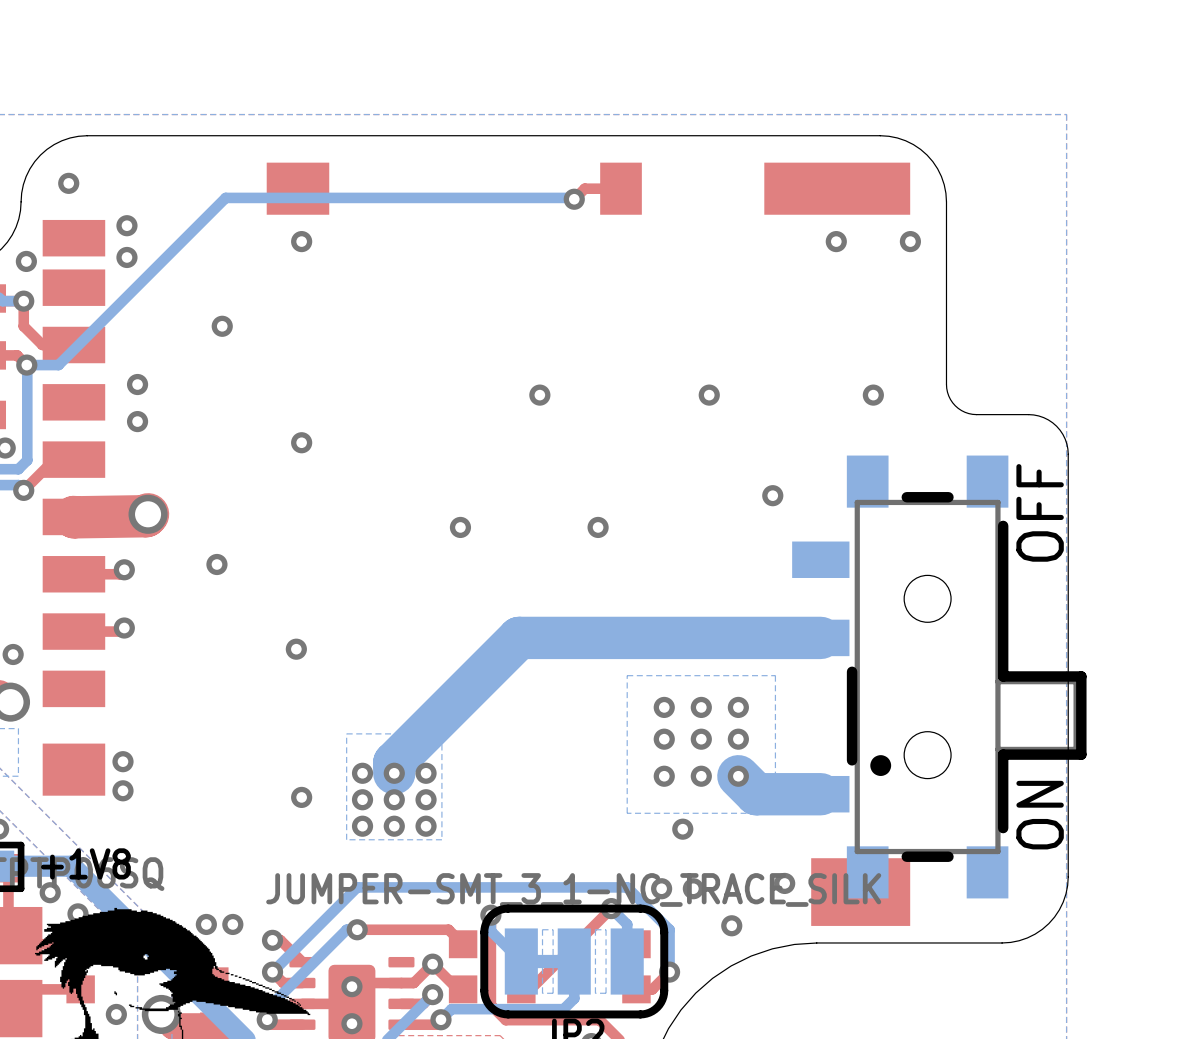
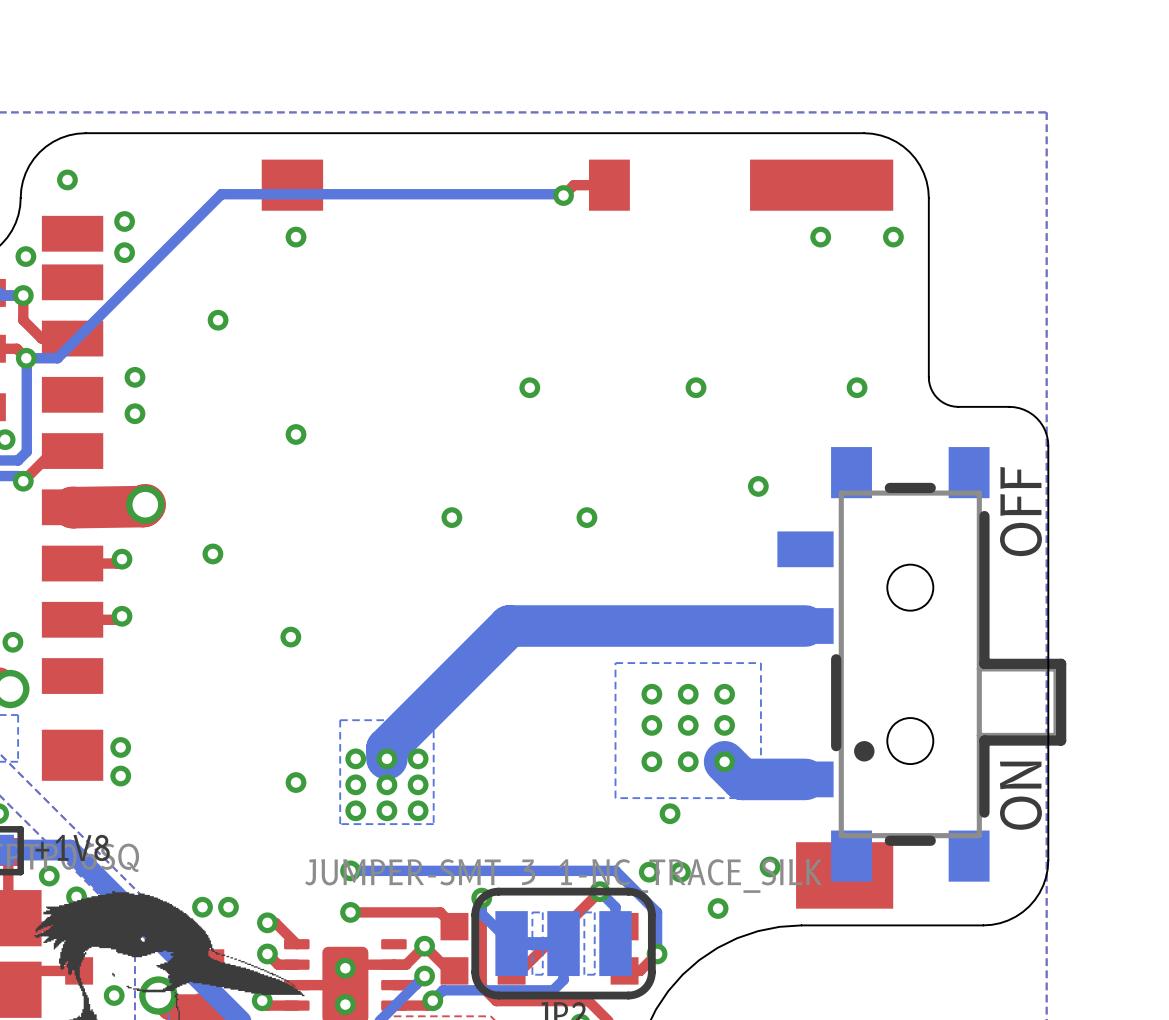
bottom track: (357, 887) (272, 972) -> none
via: none -> (350, 870)
bottom track: (357, 929) (346, 929) (267, 1009) (267, 1019) -> none

